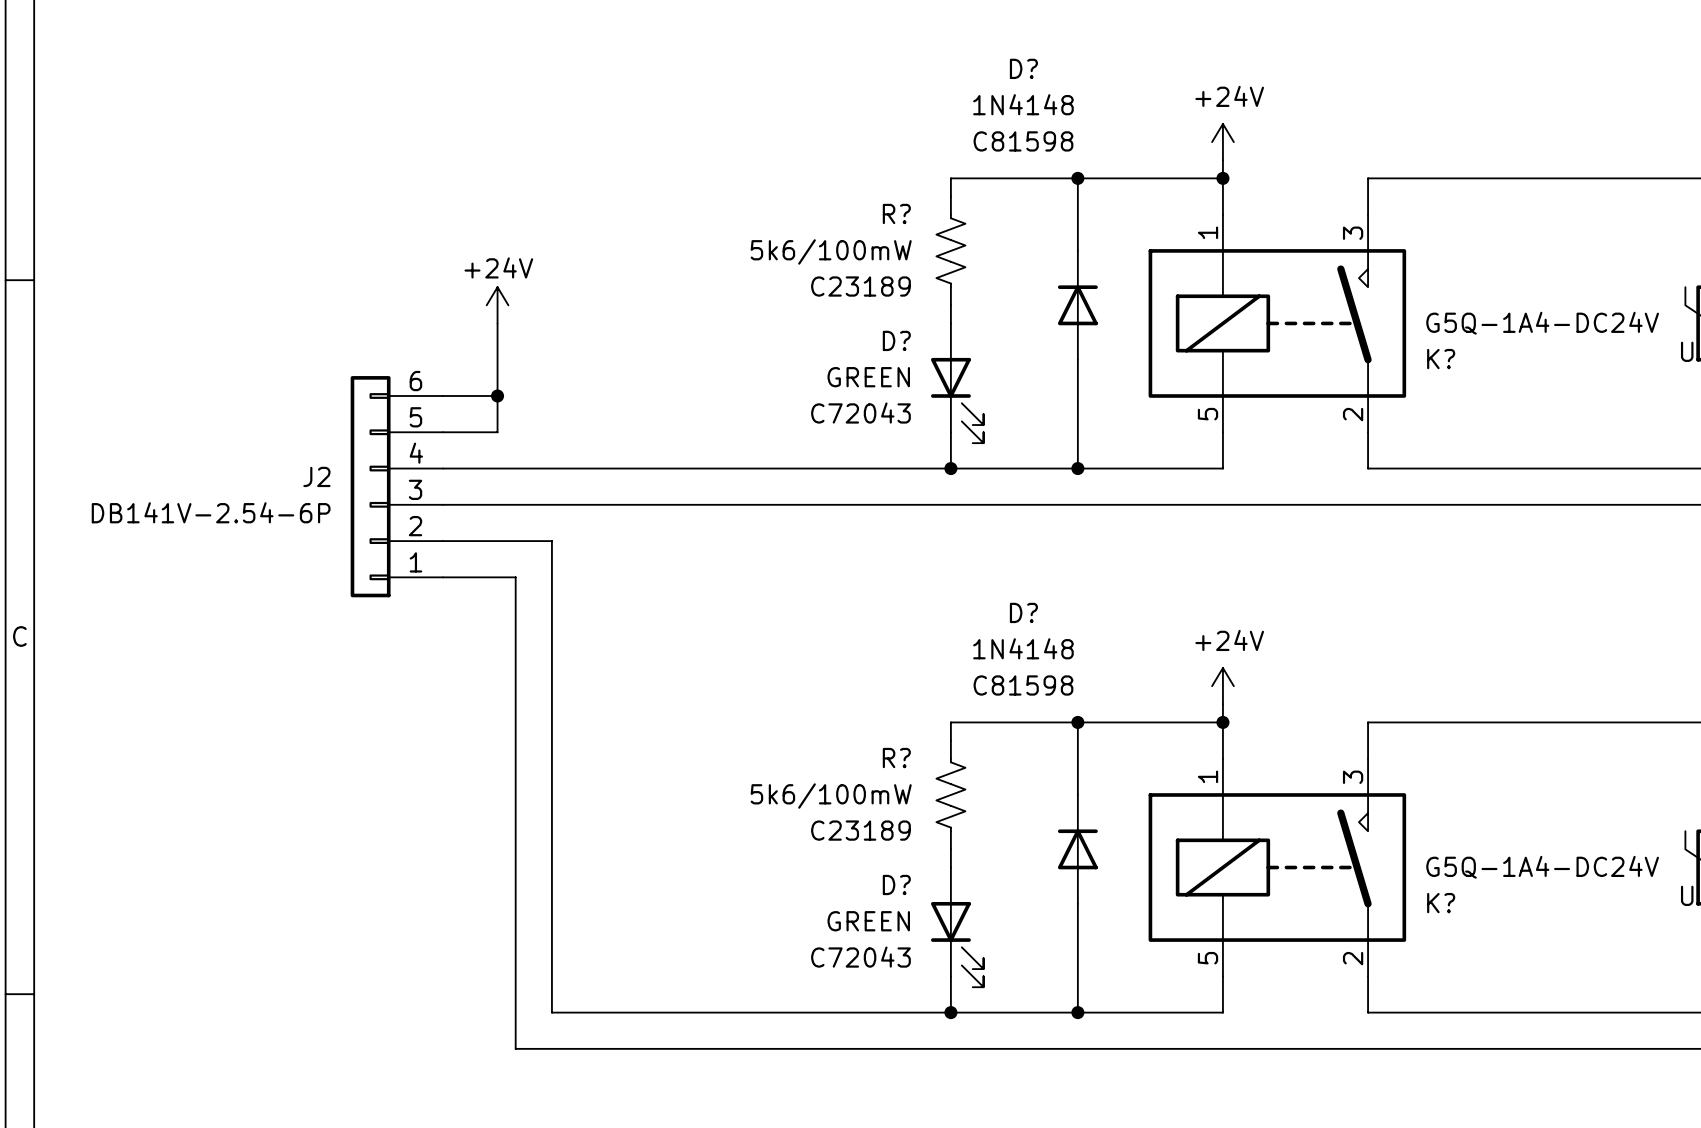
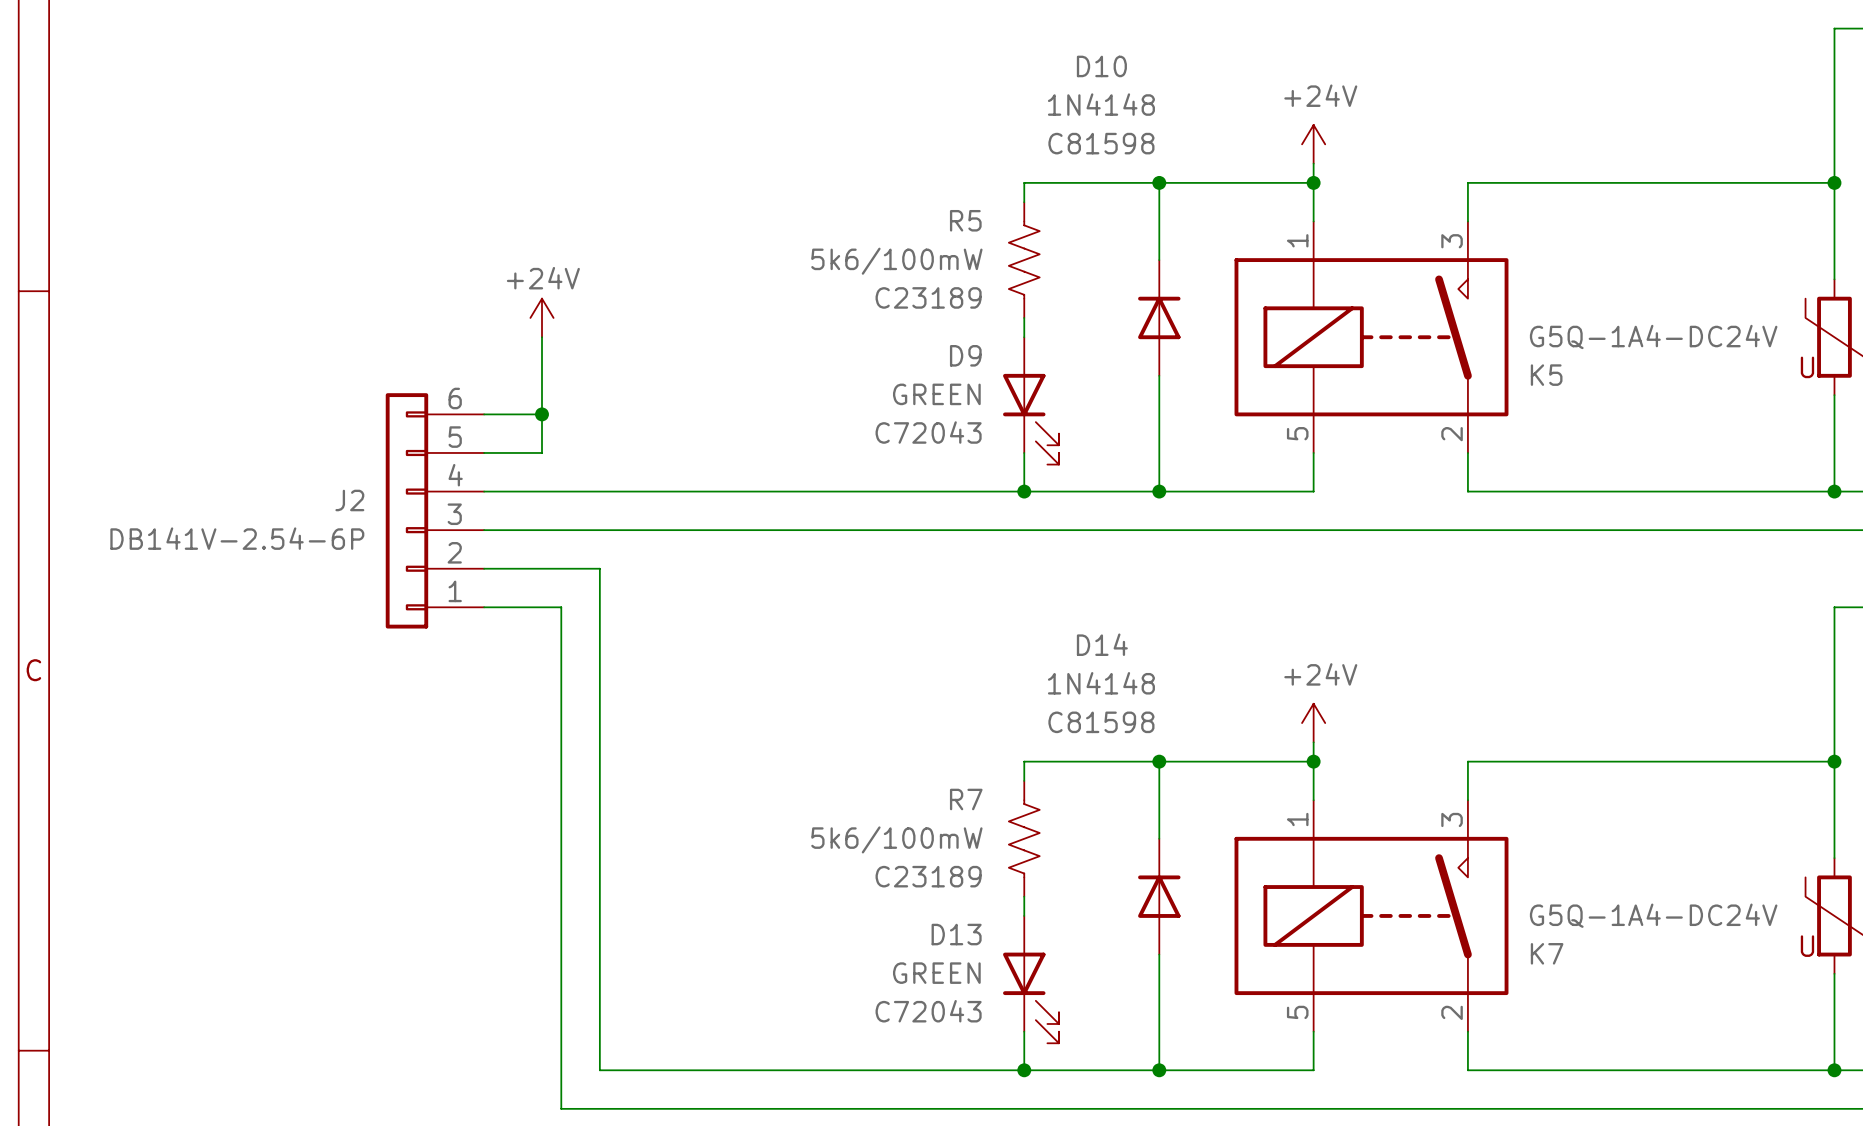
D? name: D? (1023, 68) -> D10 (1101, 66)
R? name: R? (896, 213) -> R5 (965, 220)
D? name: D? (896, 340) -> D9 (965, 355)
K? name: K? (1441, 359) -> K5 (1546, 375)
D? name: D? (1023, 612) -> D14 (1102, 644)
R? name: R? (896, 758) -> R7 (966, 799)
D? name: D? (896, 884) -> D13 (956, 934)
K? name: K? (1441, 903) -> K7 (1547, 953)

